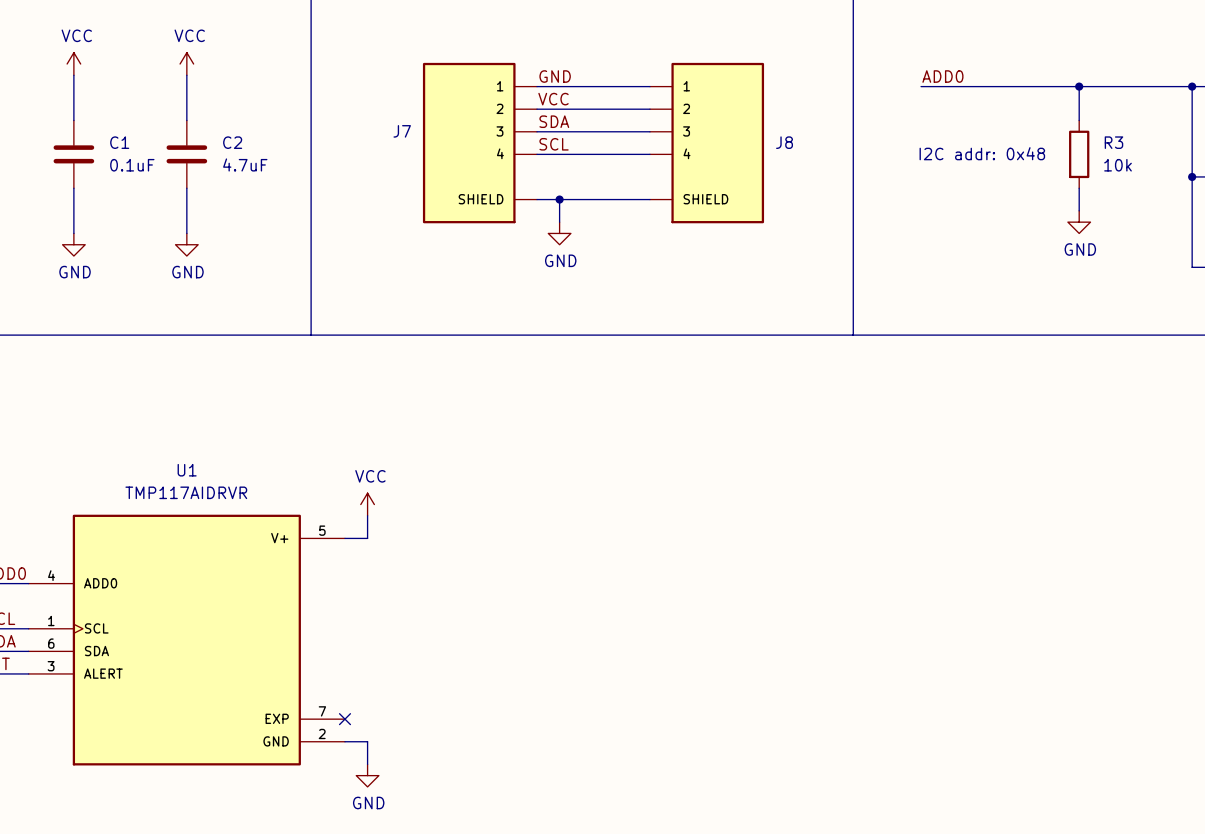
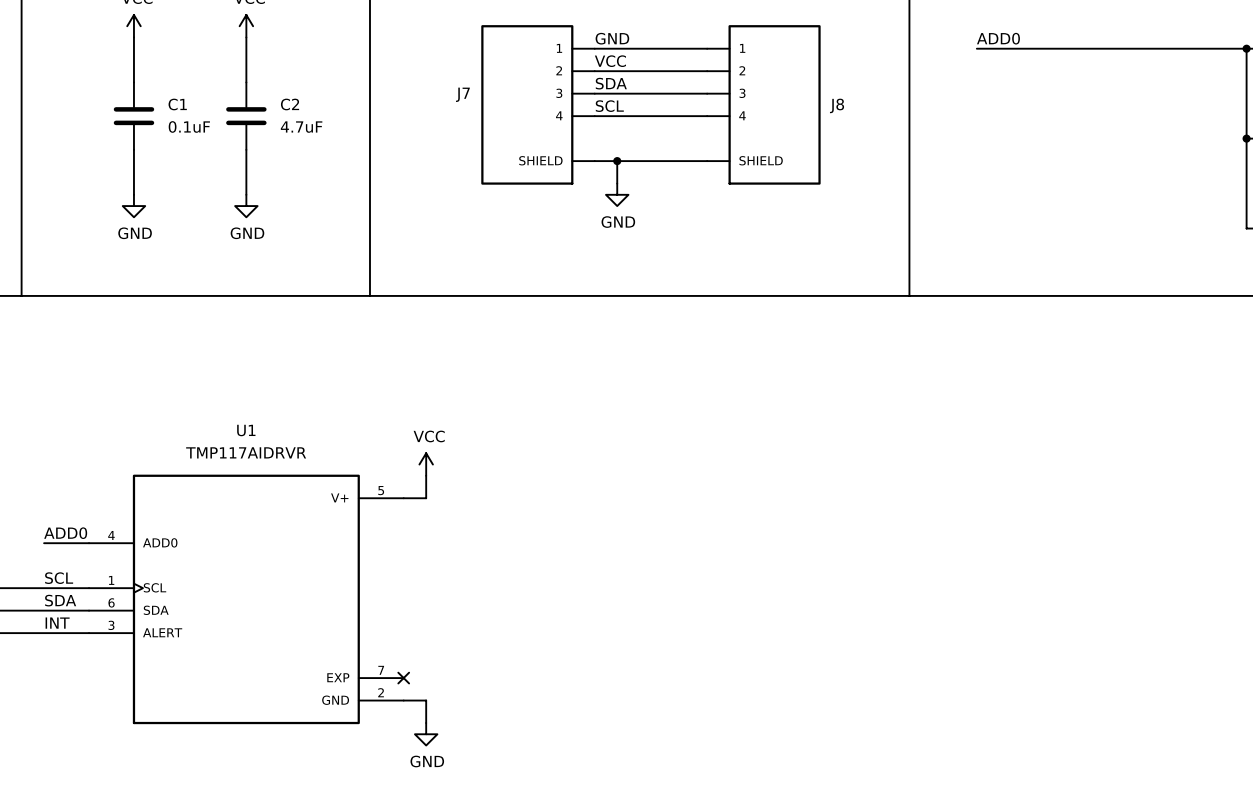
wire: (1079, 86) (1079, 120) -> none
junction: (1079, 86) -> none
text: I2C addr: 0x48 (982, 153) -> none
R3: 10k (1079, 154) -> none
wire: (1079, 188) (1079, 210) -> none
power symbol: GND (1079, 222) -> none

